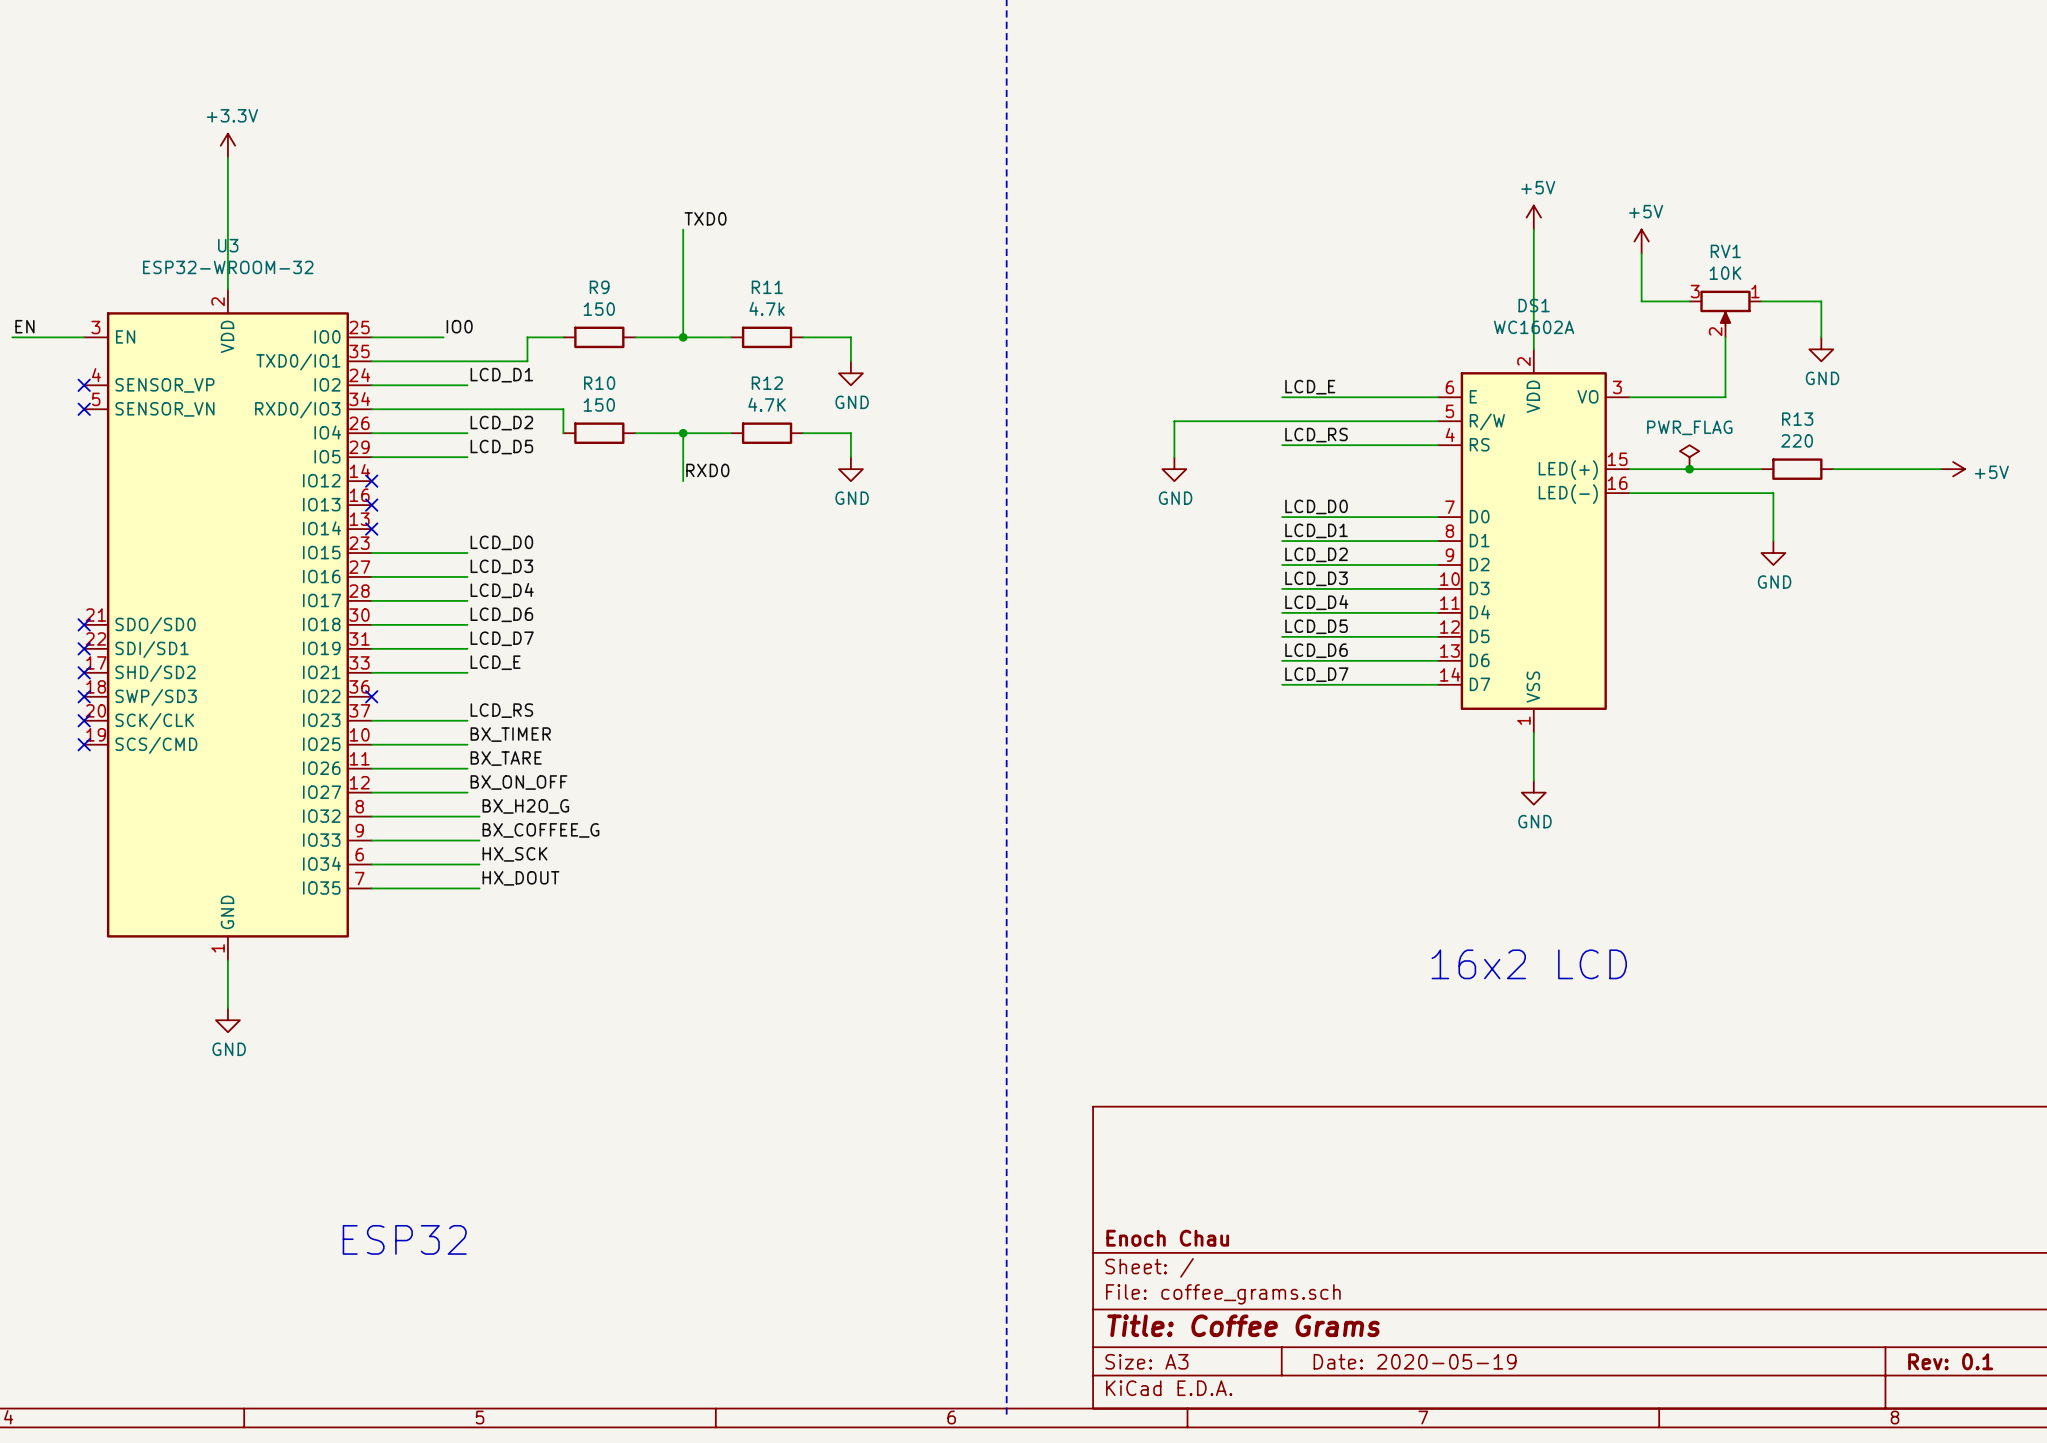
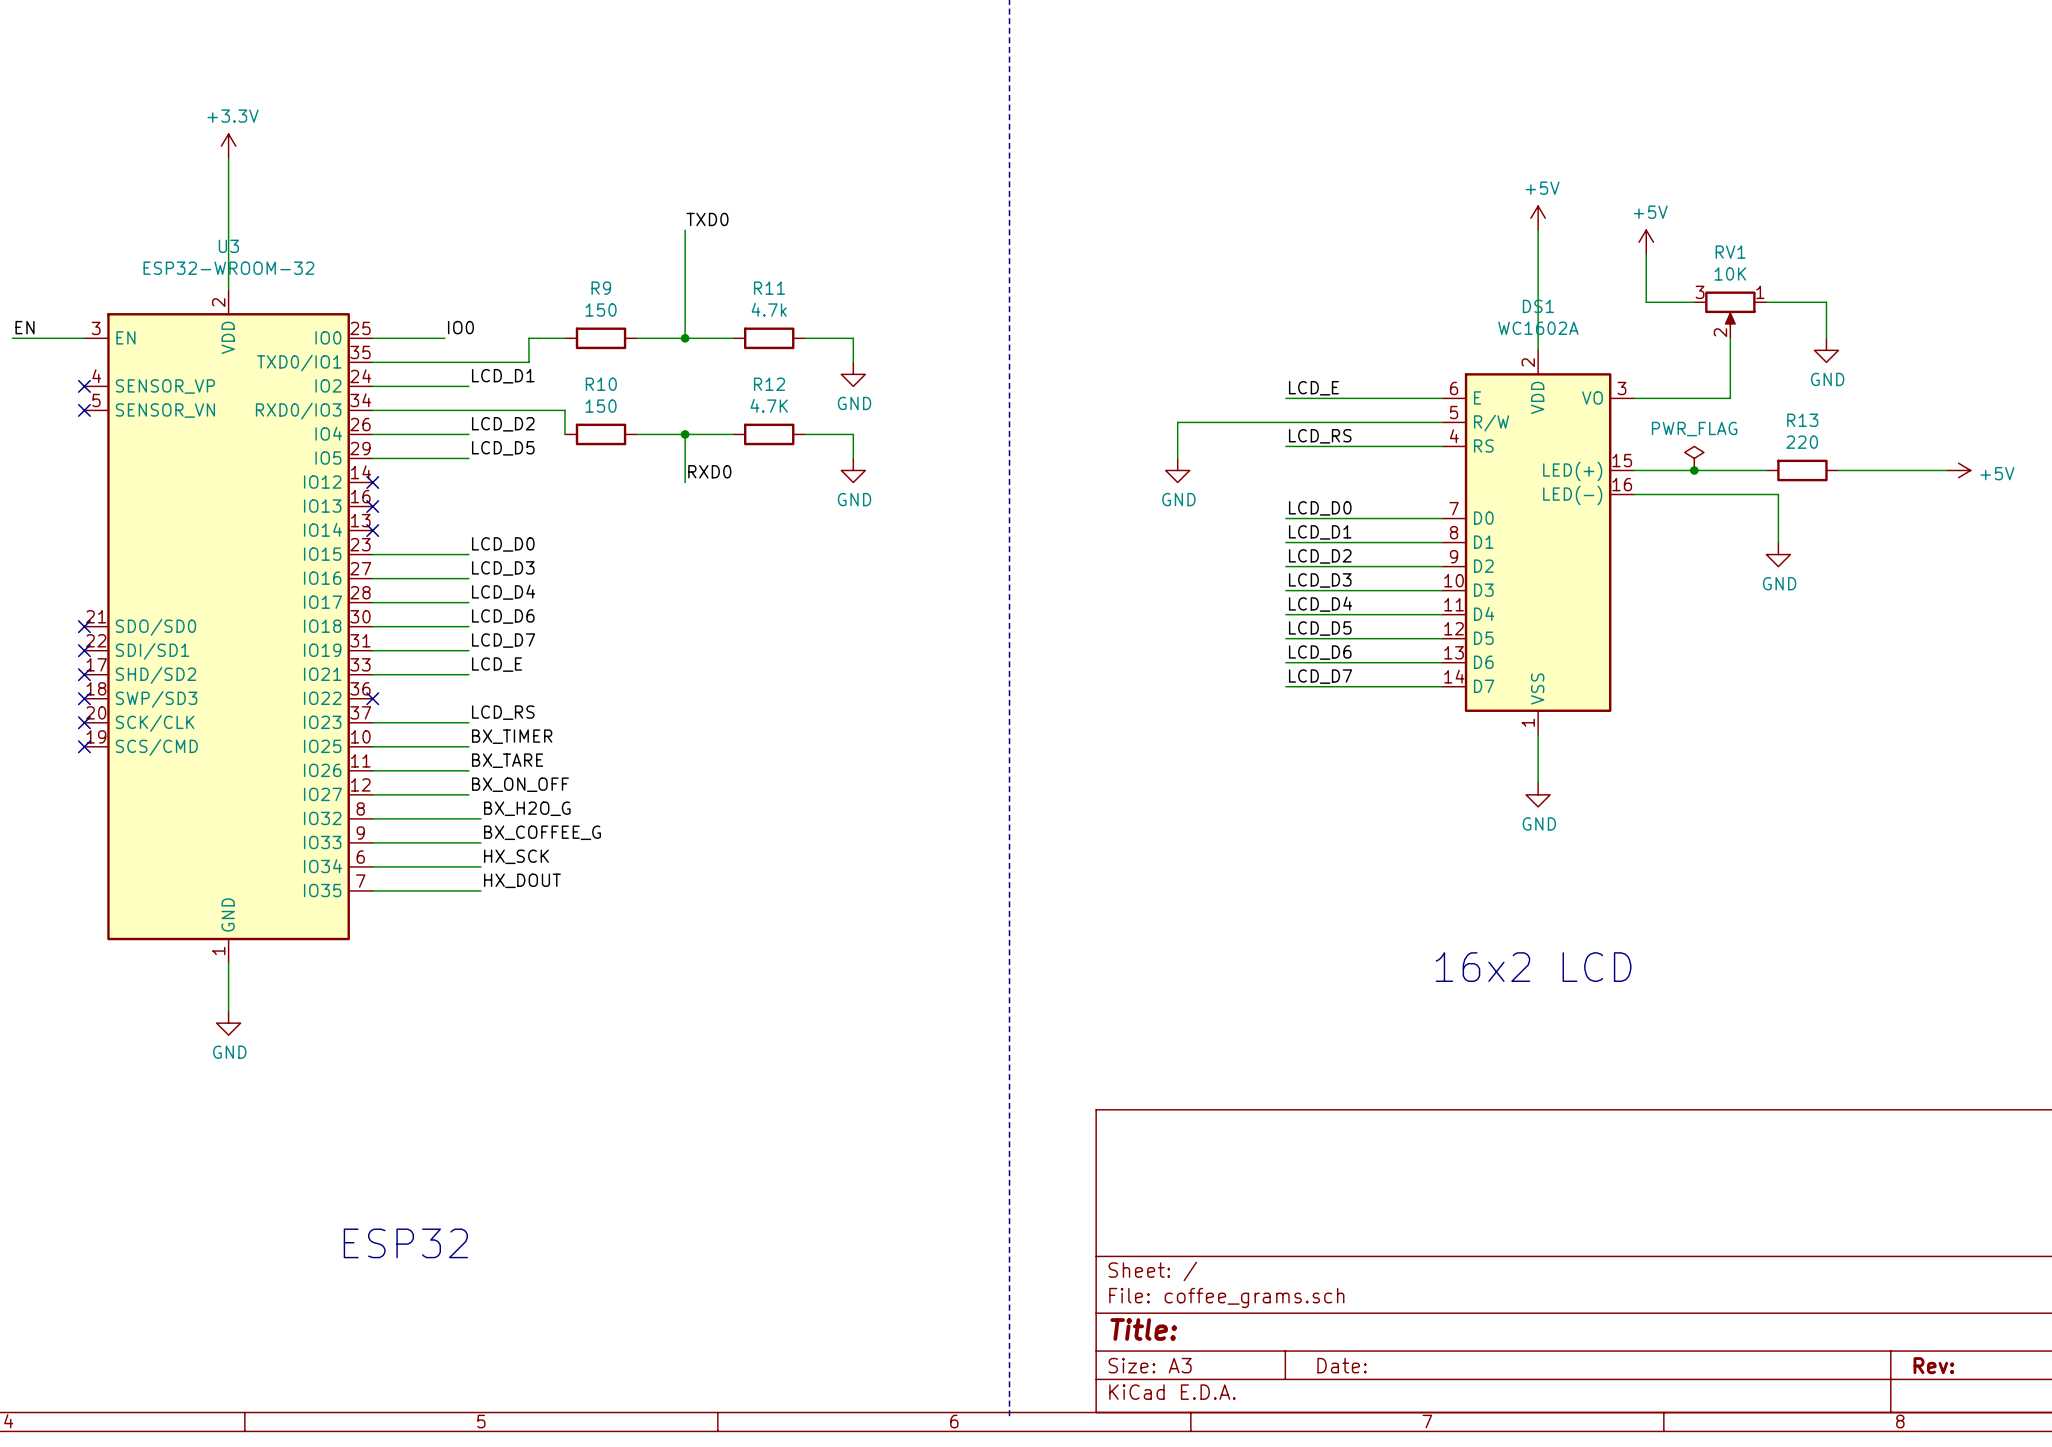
title block: Enoch Chau (1167, 1238) -> none
title block: Title: Coffee Grams (1243, 1325) -> Title: (1143, 1329)
title block: Date: 2020-05-19 (1415, 1361) -> Date: (1342, 1365)
title block: Rev: 0.1 (1950, 1361) -> Rev: (1933, 1365)

